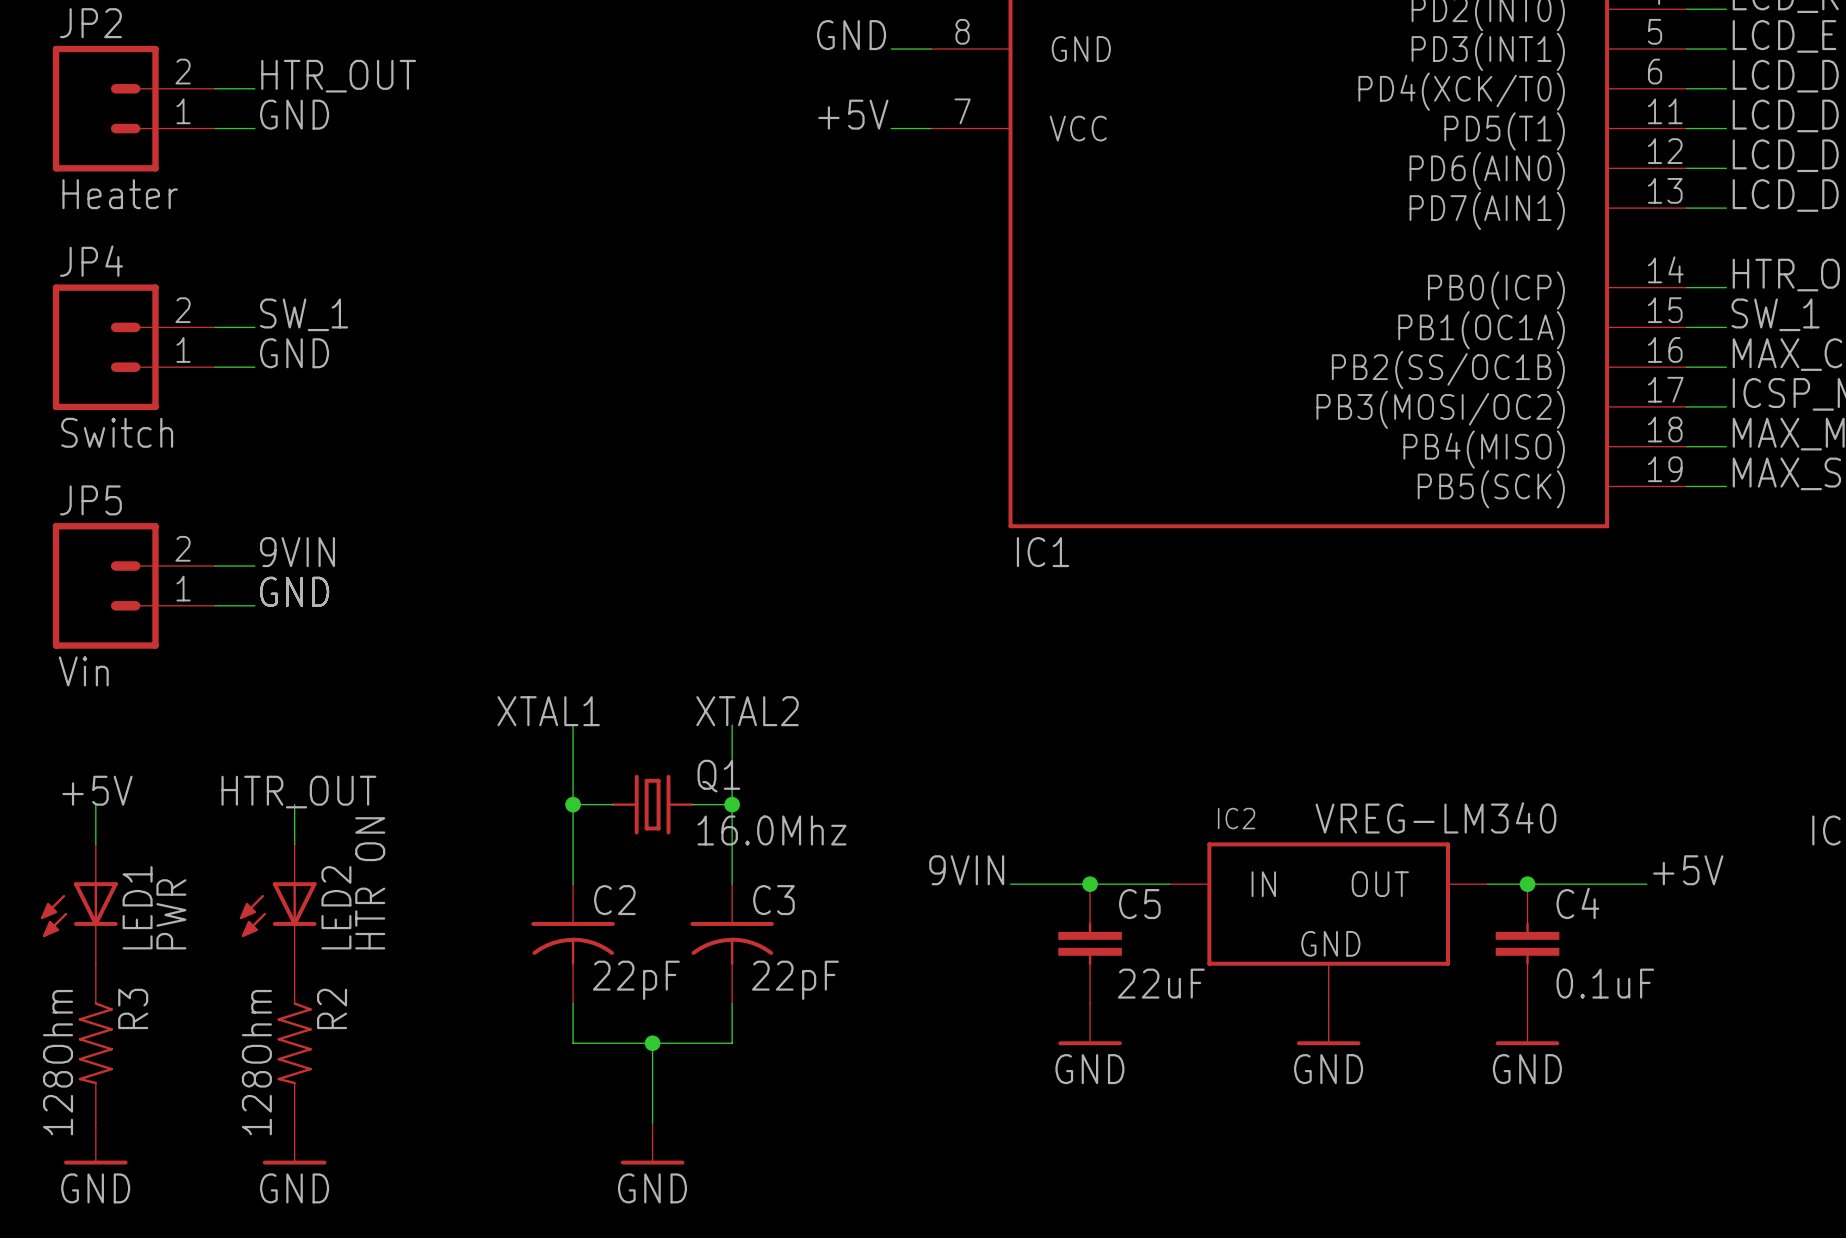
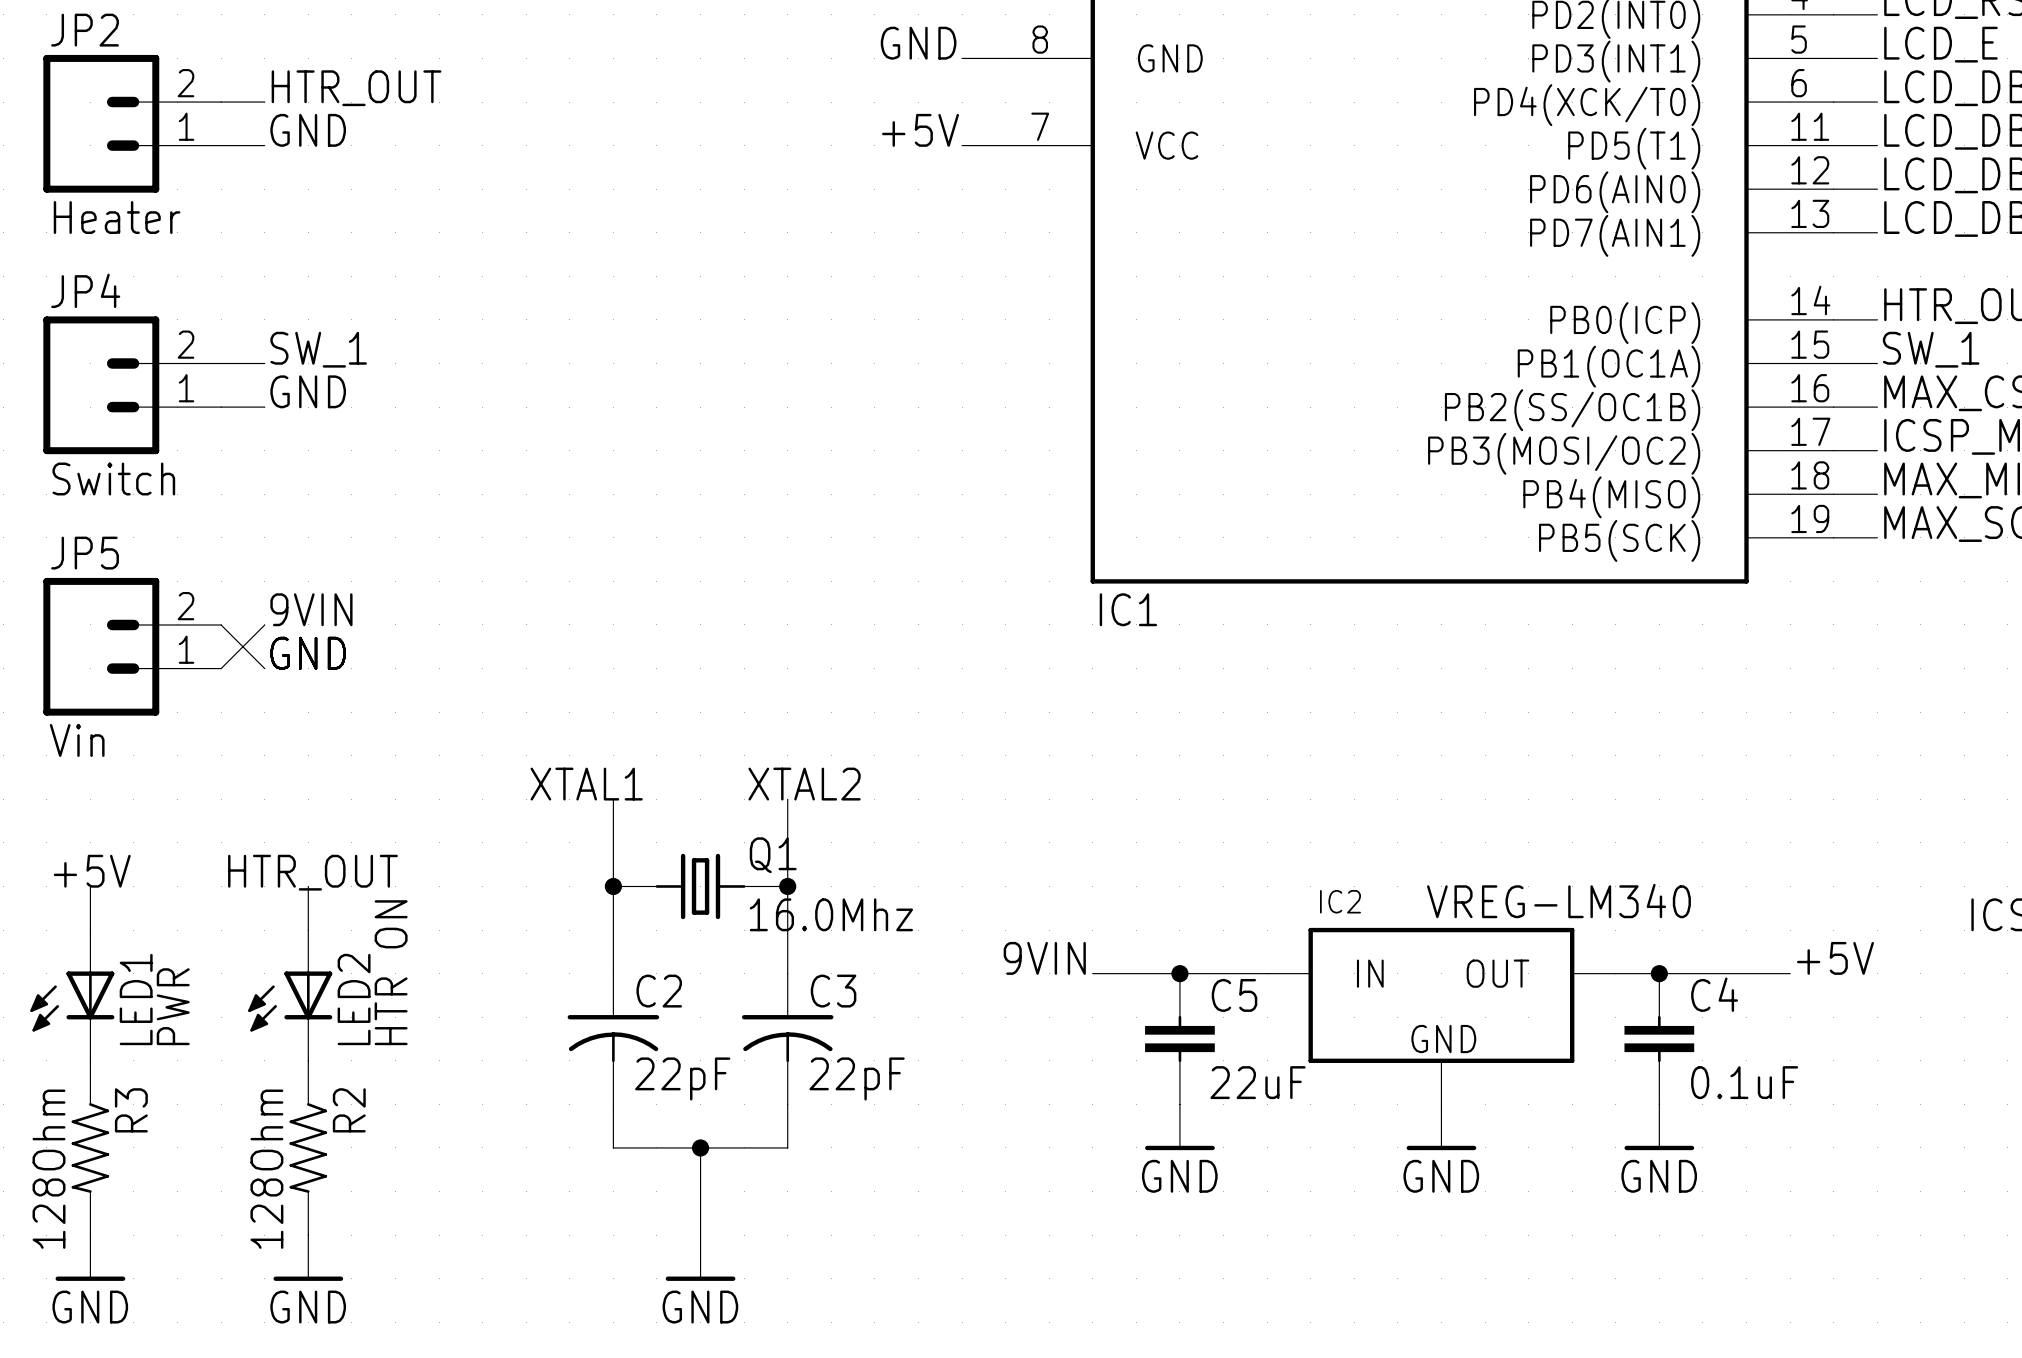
wire: (215, 566) (254, 566) -> (221, 624) (264, 668)
wire: (215, 605) (254, 605) -> (221, 668) (264, 624)

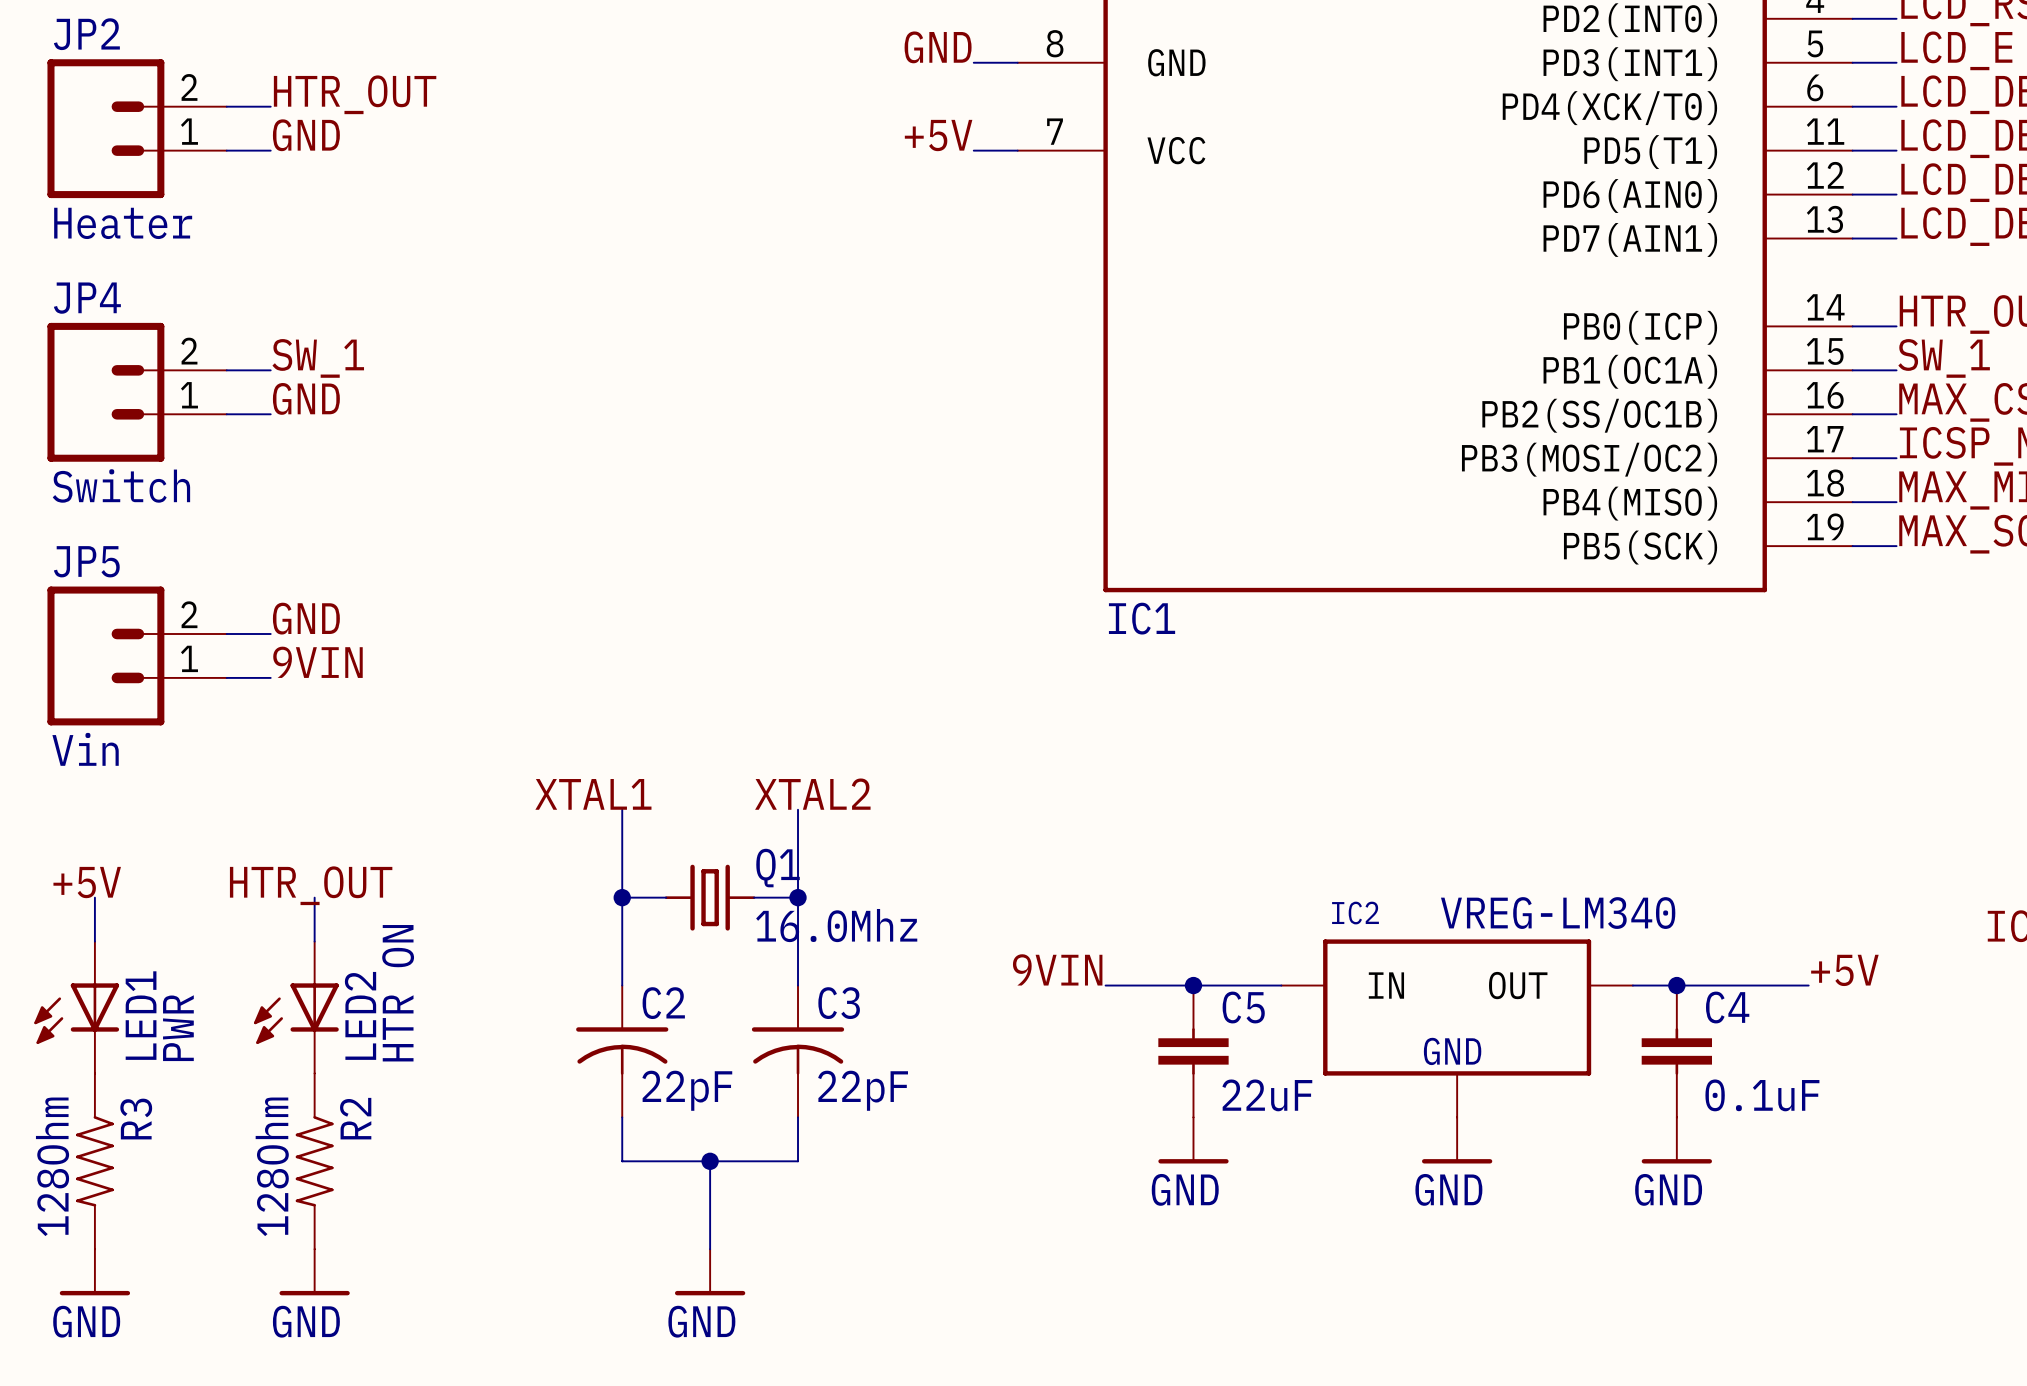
label: 9VIN (311, 609) -> GND (306, 618)
wire: (221, 624) (264, 668) -> (226, 634) (270, 634)
wire: (264, 624) (221, 668) -> (270, 677) (226, 677)
label: GND (308, 653) -> 9VIN (317, 662)

